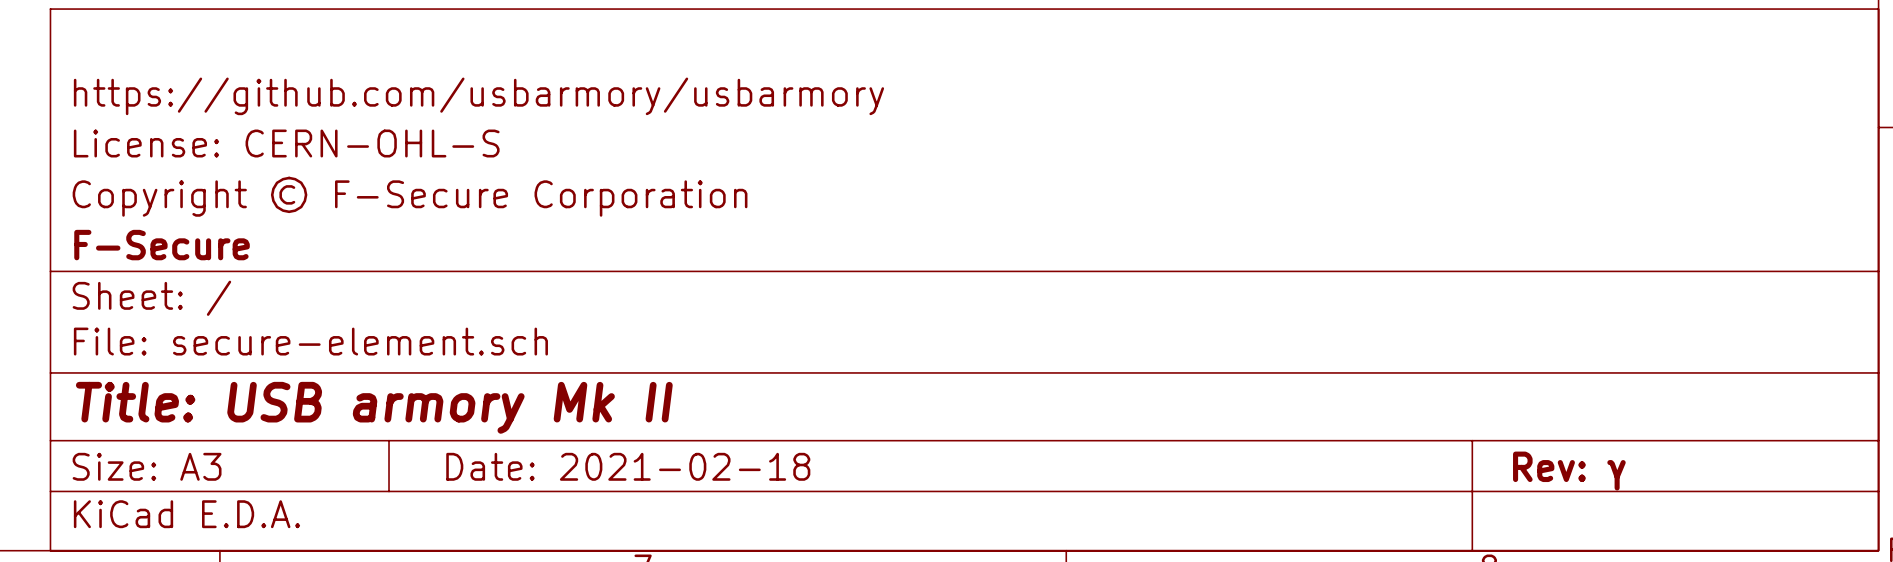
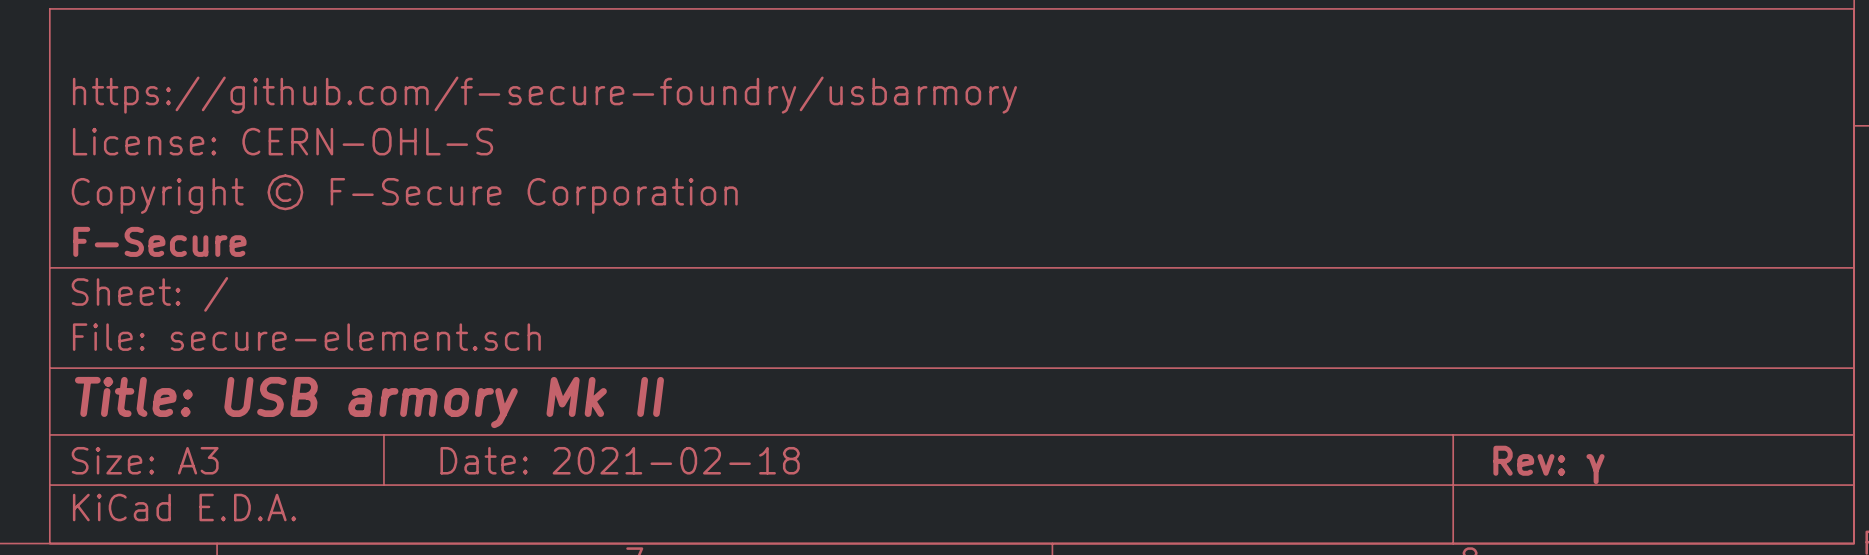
title block: https://github.com/usbarmory/usbarmory (478, 96) -> https://github.com/f-secure-foundry/usbarmory (544, 95)

